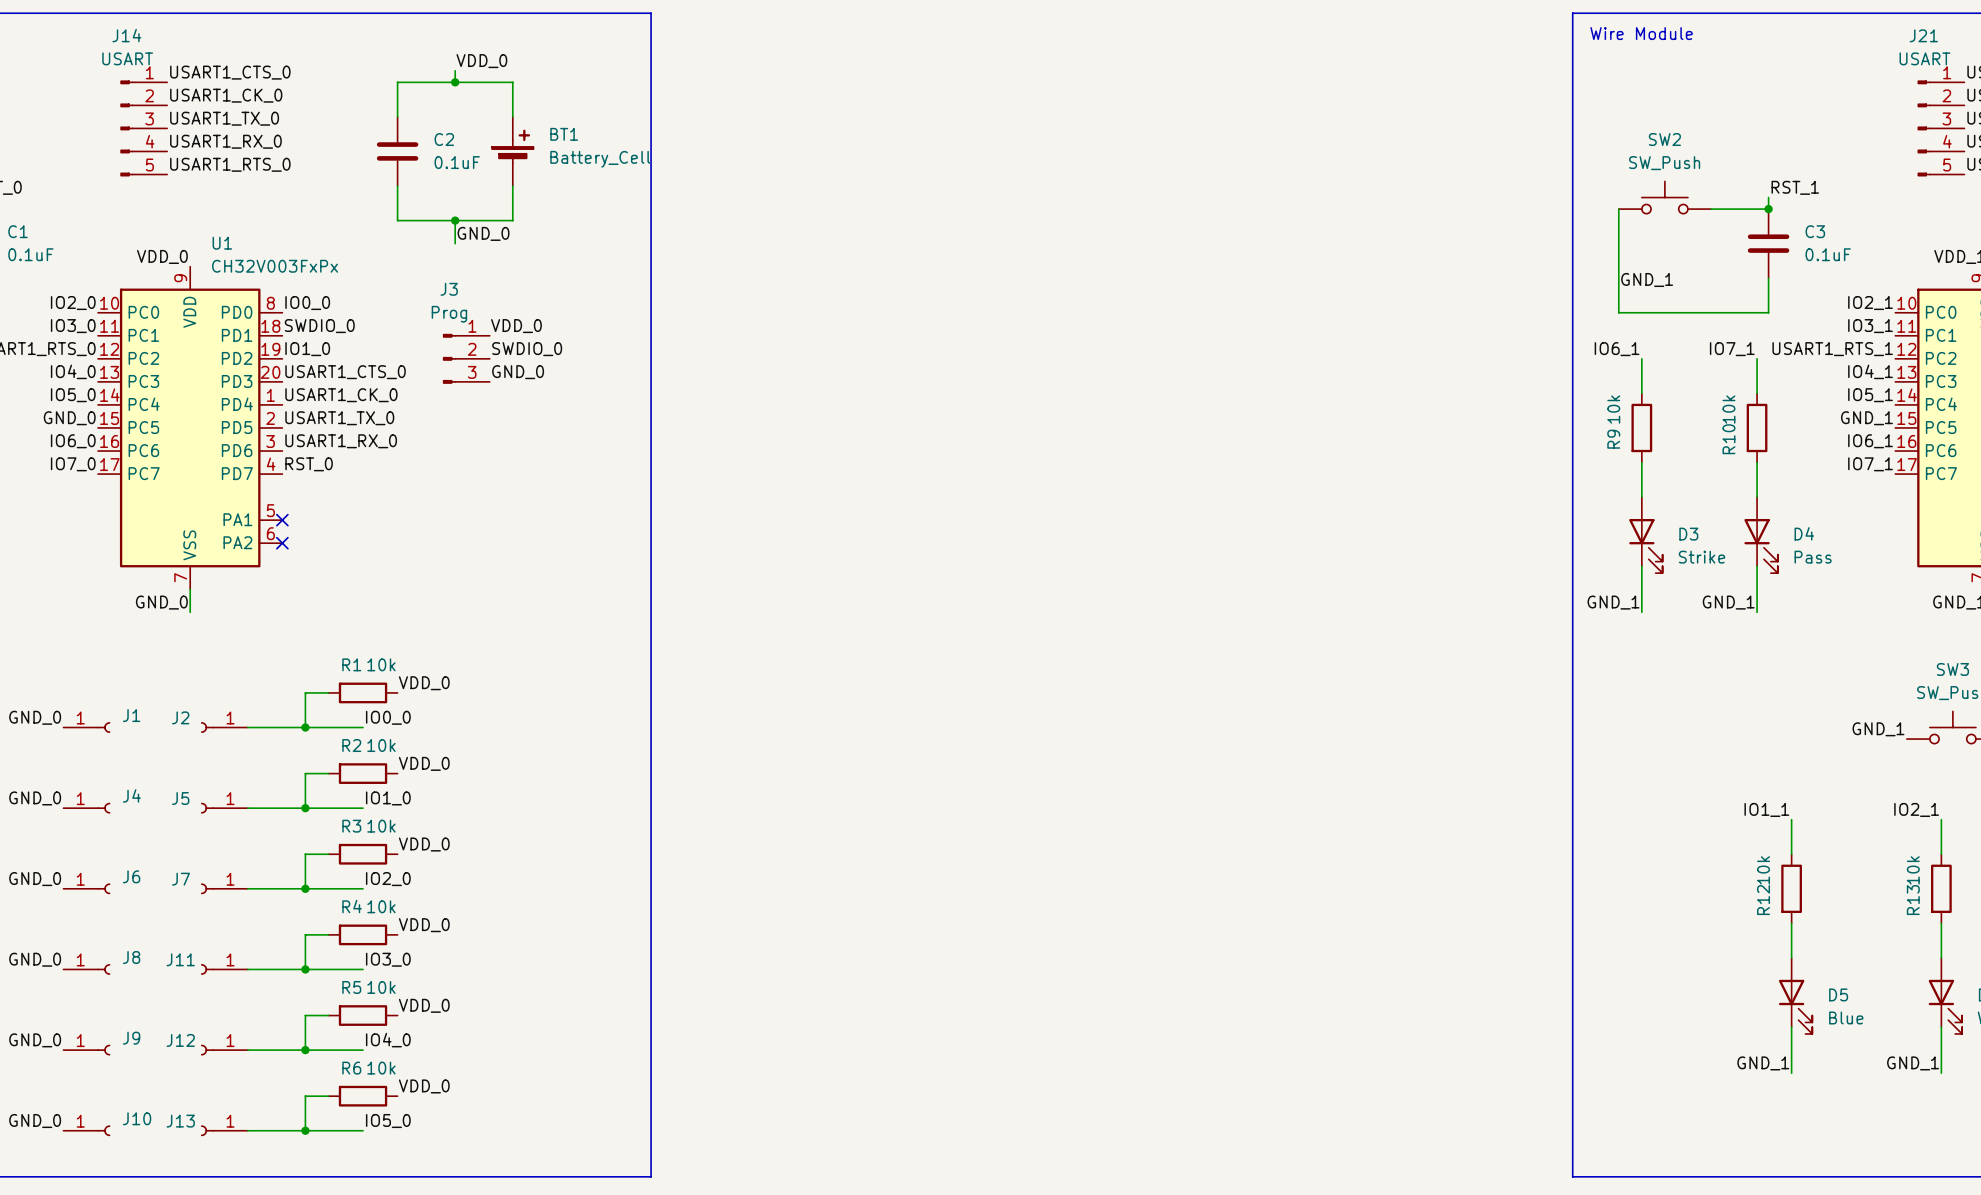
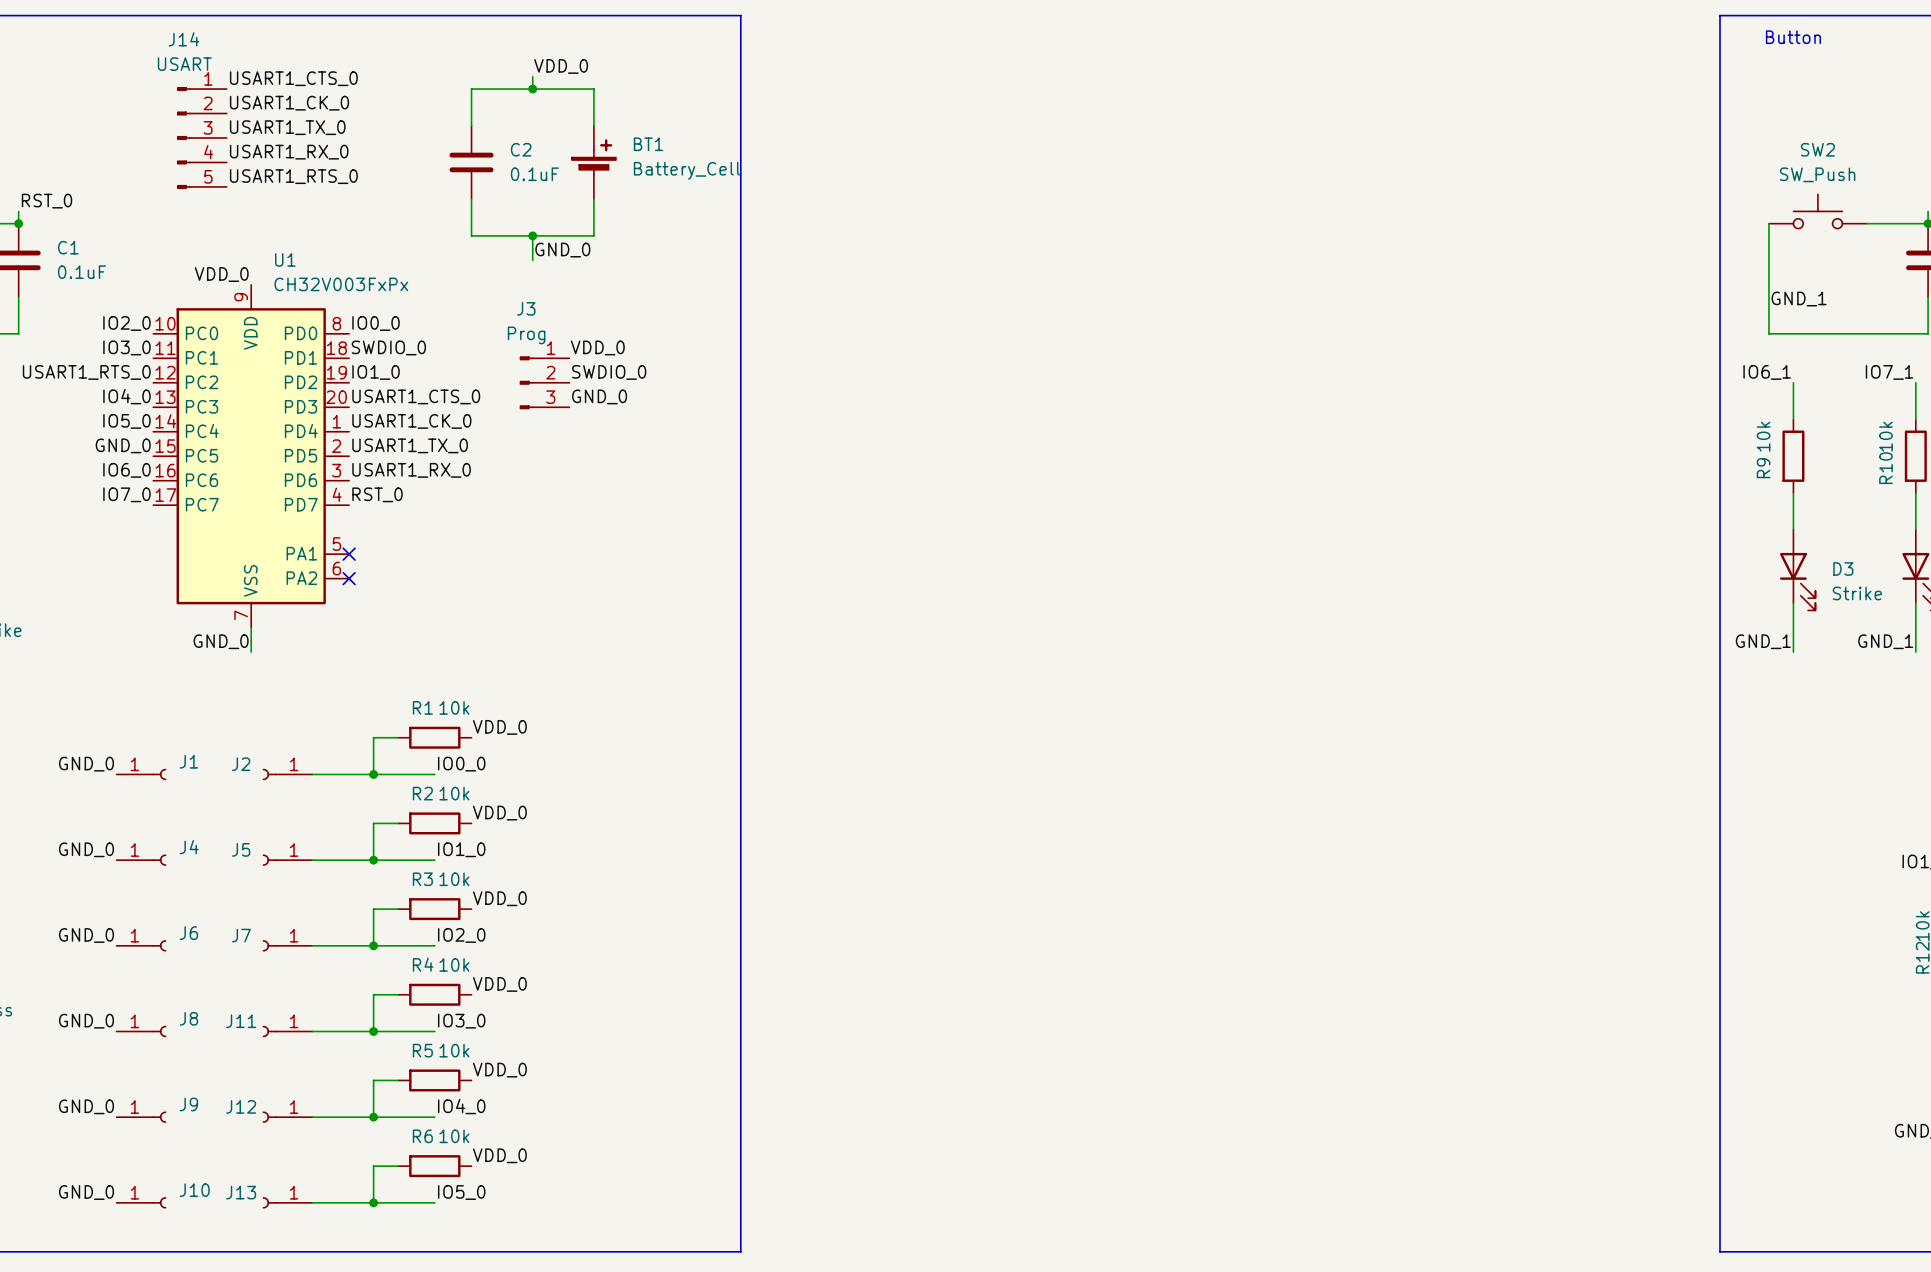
text: Wire Module (1641, 33) -> Button (1793, 37)

